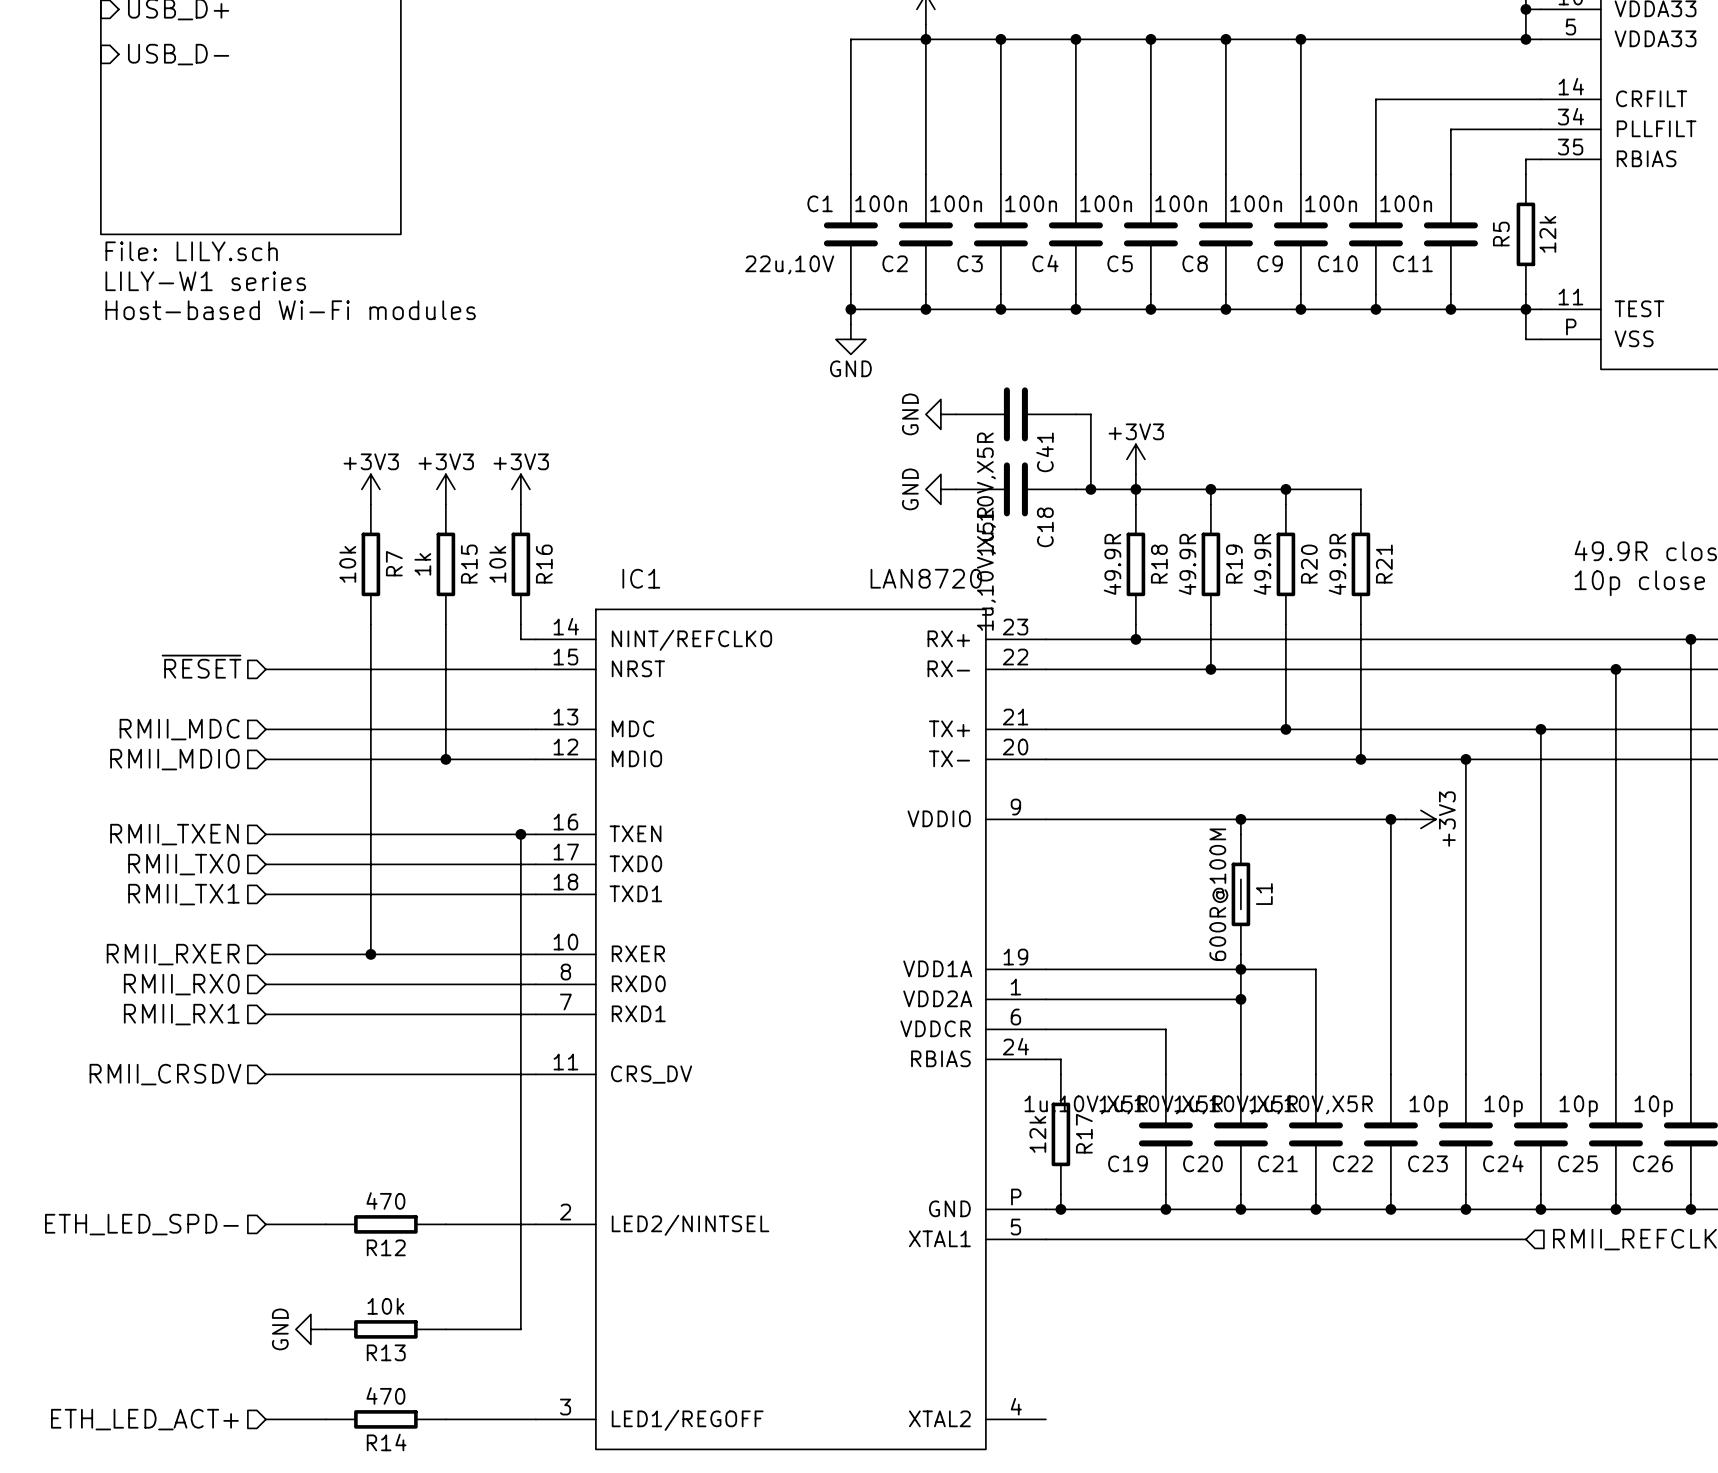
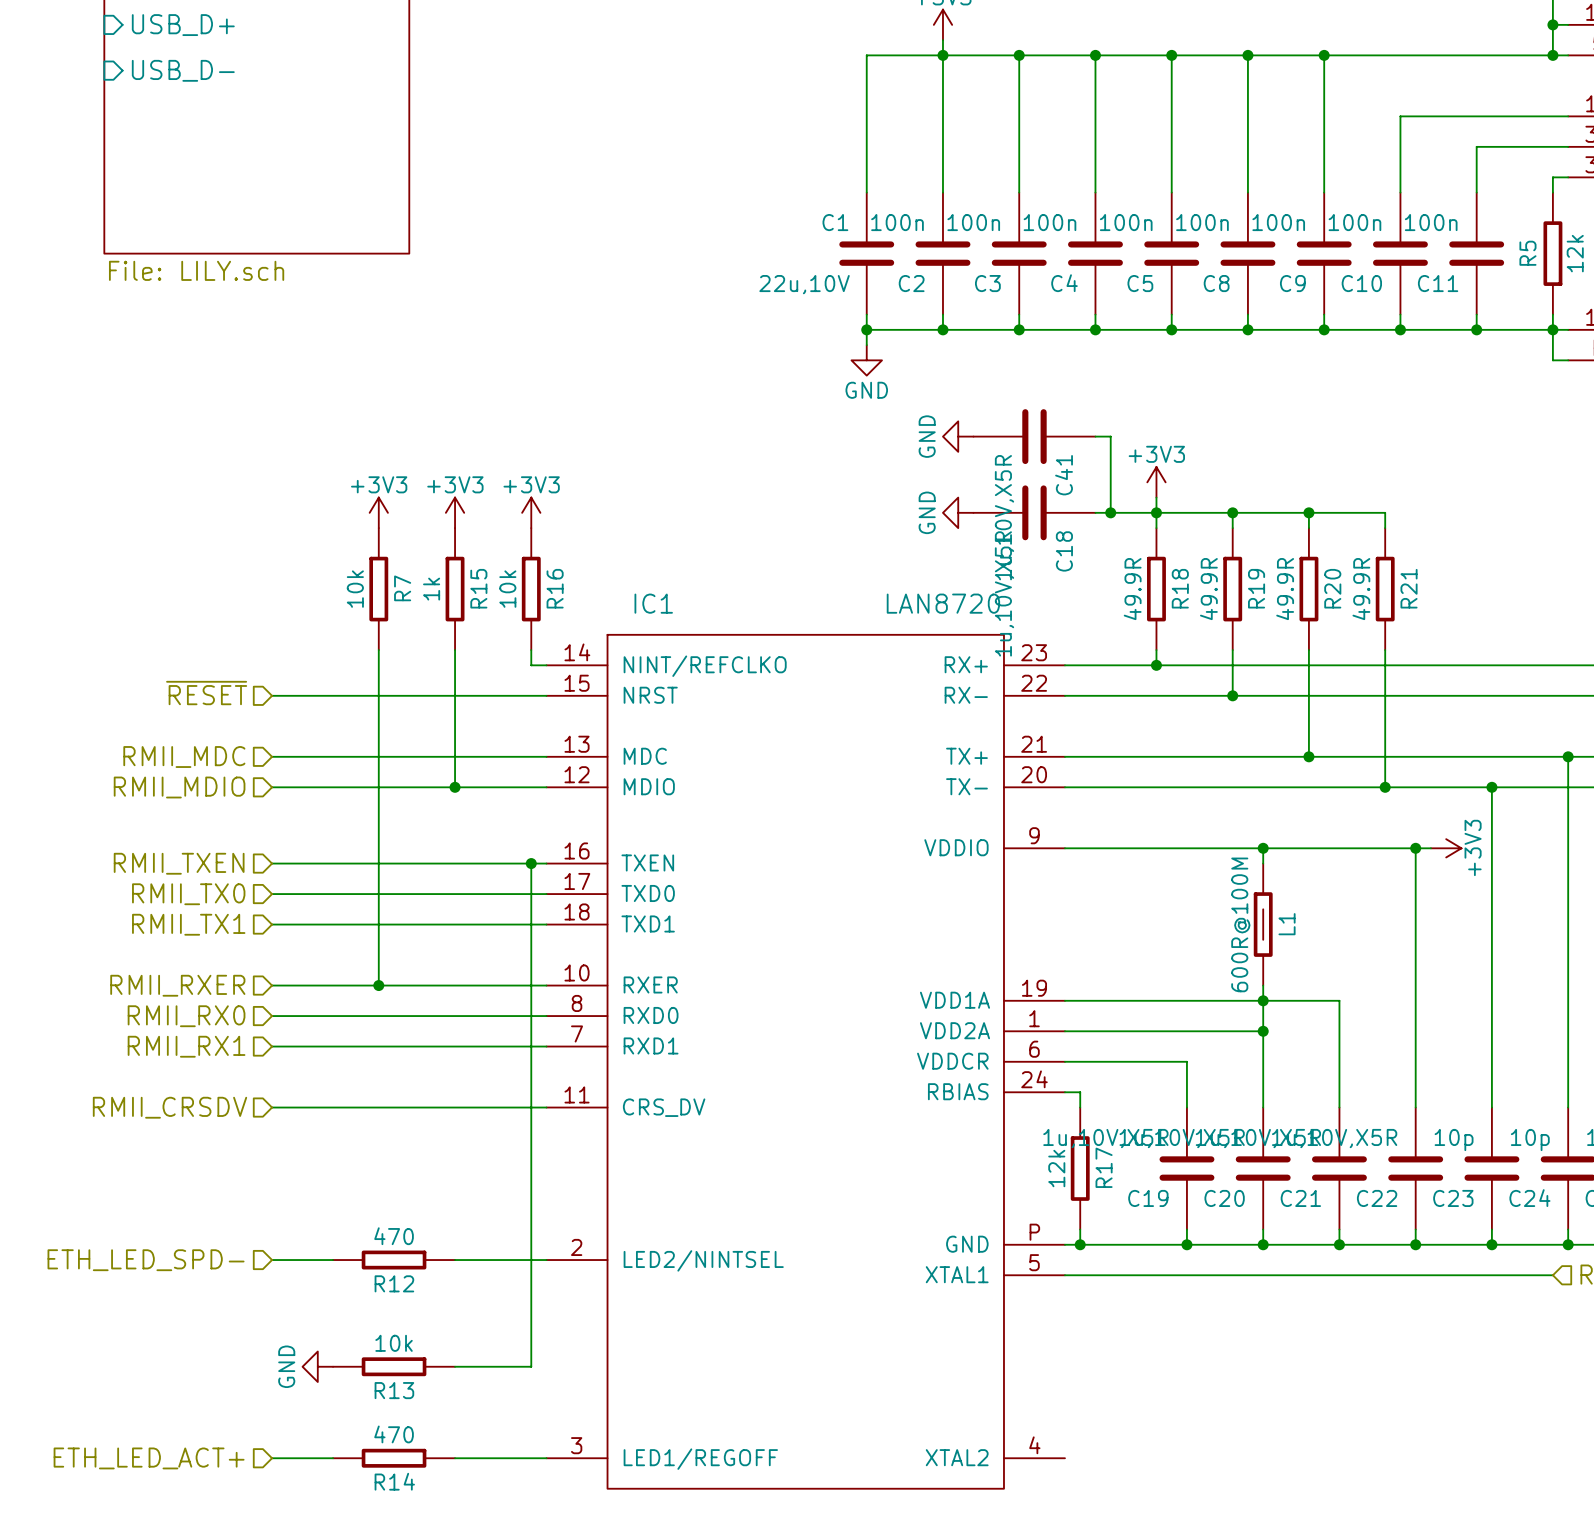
text: LILY-W1 series (205, 281) -> none
text: Host-based Wi-Fi modules (290, 310) -> none

